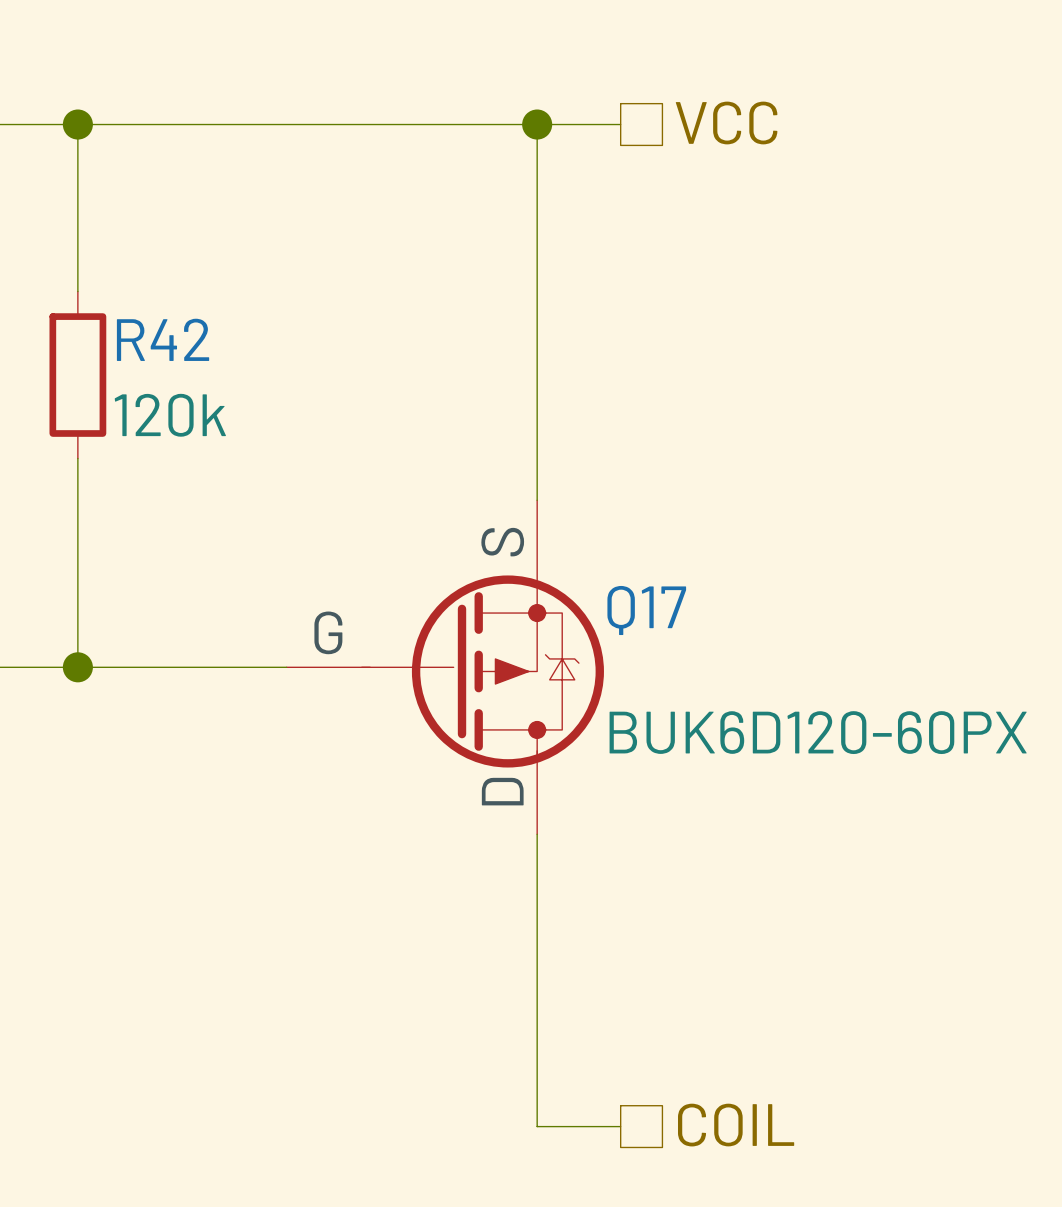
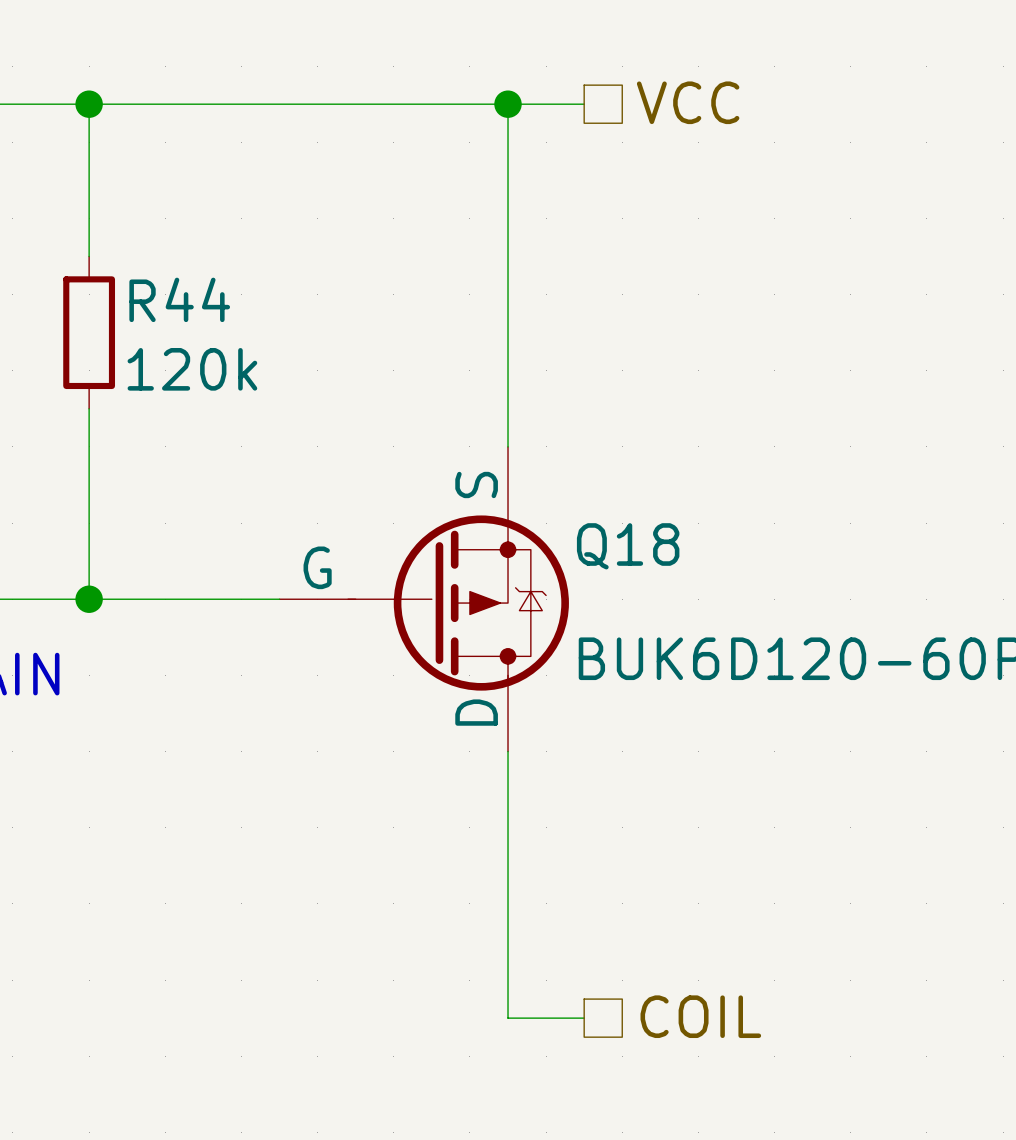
R42 name: R42 (163, 339) -> R44 (179, 299)
Q17 name: Q17 (646, 610) -> Q18 (628, 546)

